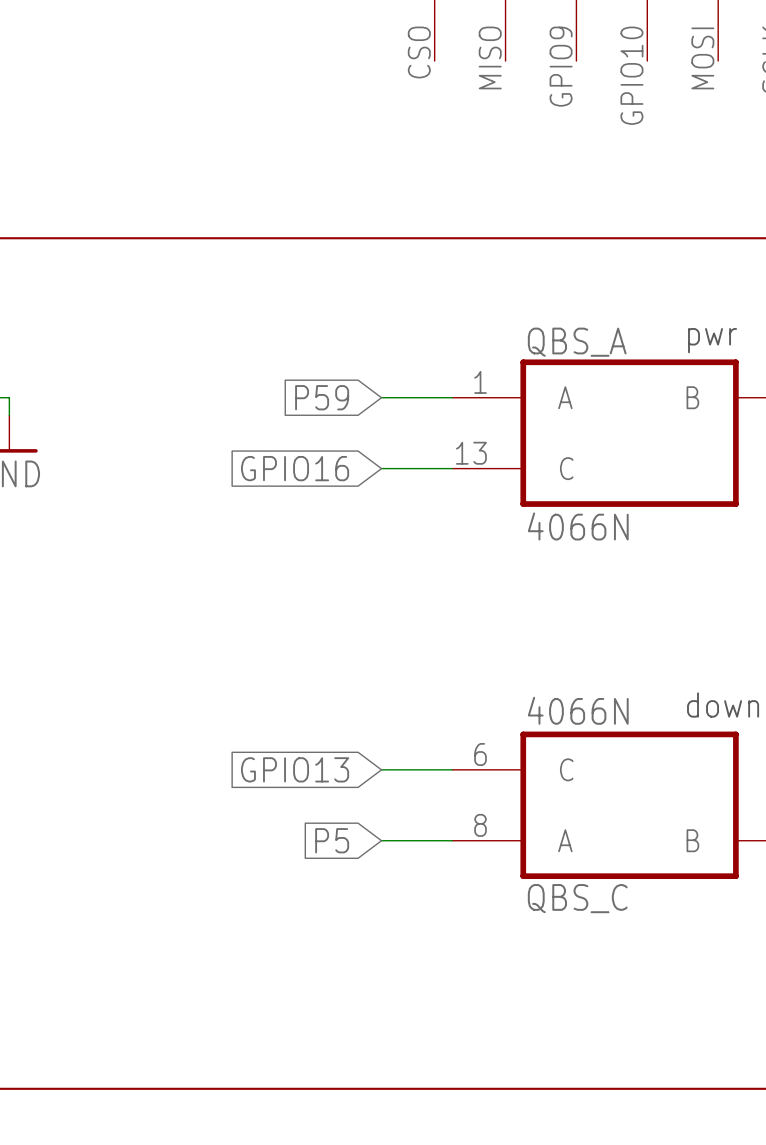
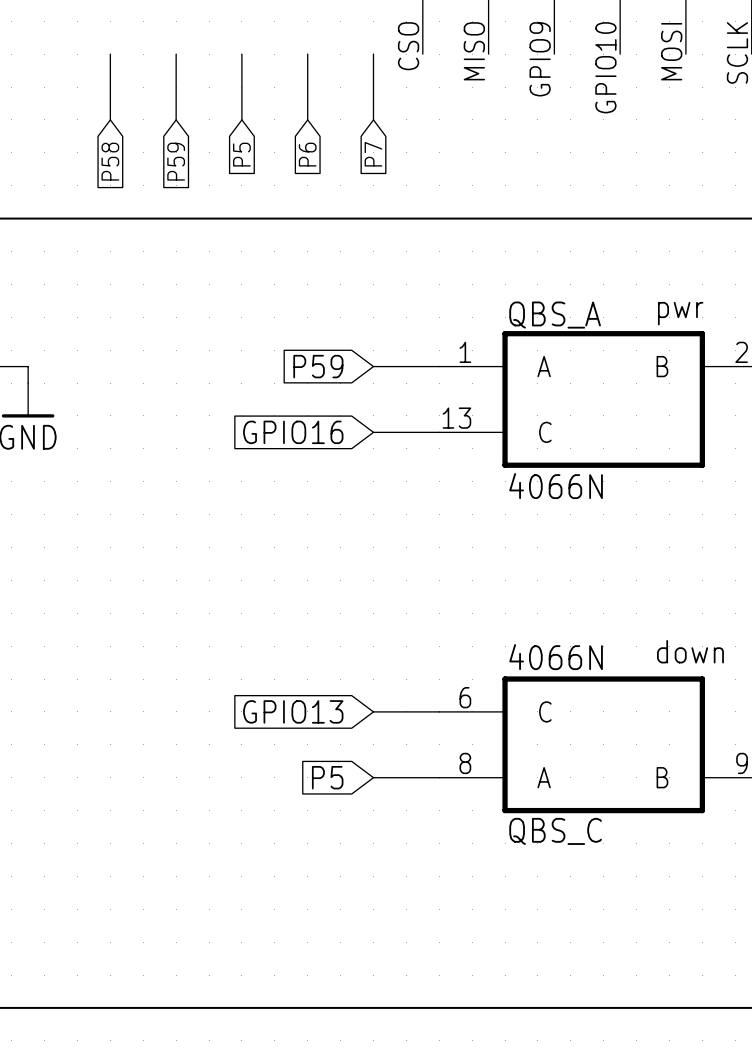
wire: none -> (110, 54) (110, 119)
wire: none -> (176, 54) (176, 119)
wire: none -> (241, 54) (241, 119)
wire: none -> (307, 54) (307, 119)
wire: none -> (373, 54) (373, 119)
global label: none -> P7 (373, 154)
global label: none -> P5 (241, 154)
global label: none -> P6 (307, 154)
global label: none -> P58 (110, 161)
global label: none -> P59 (176, 161)

